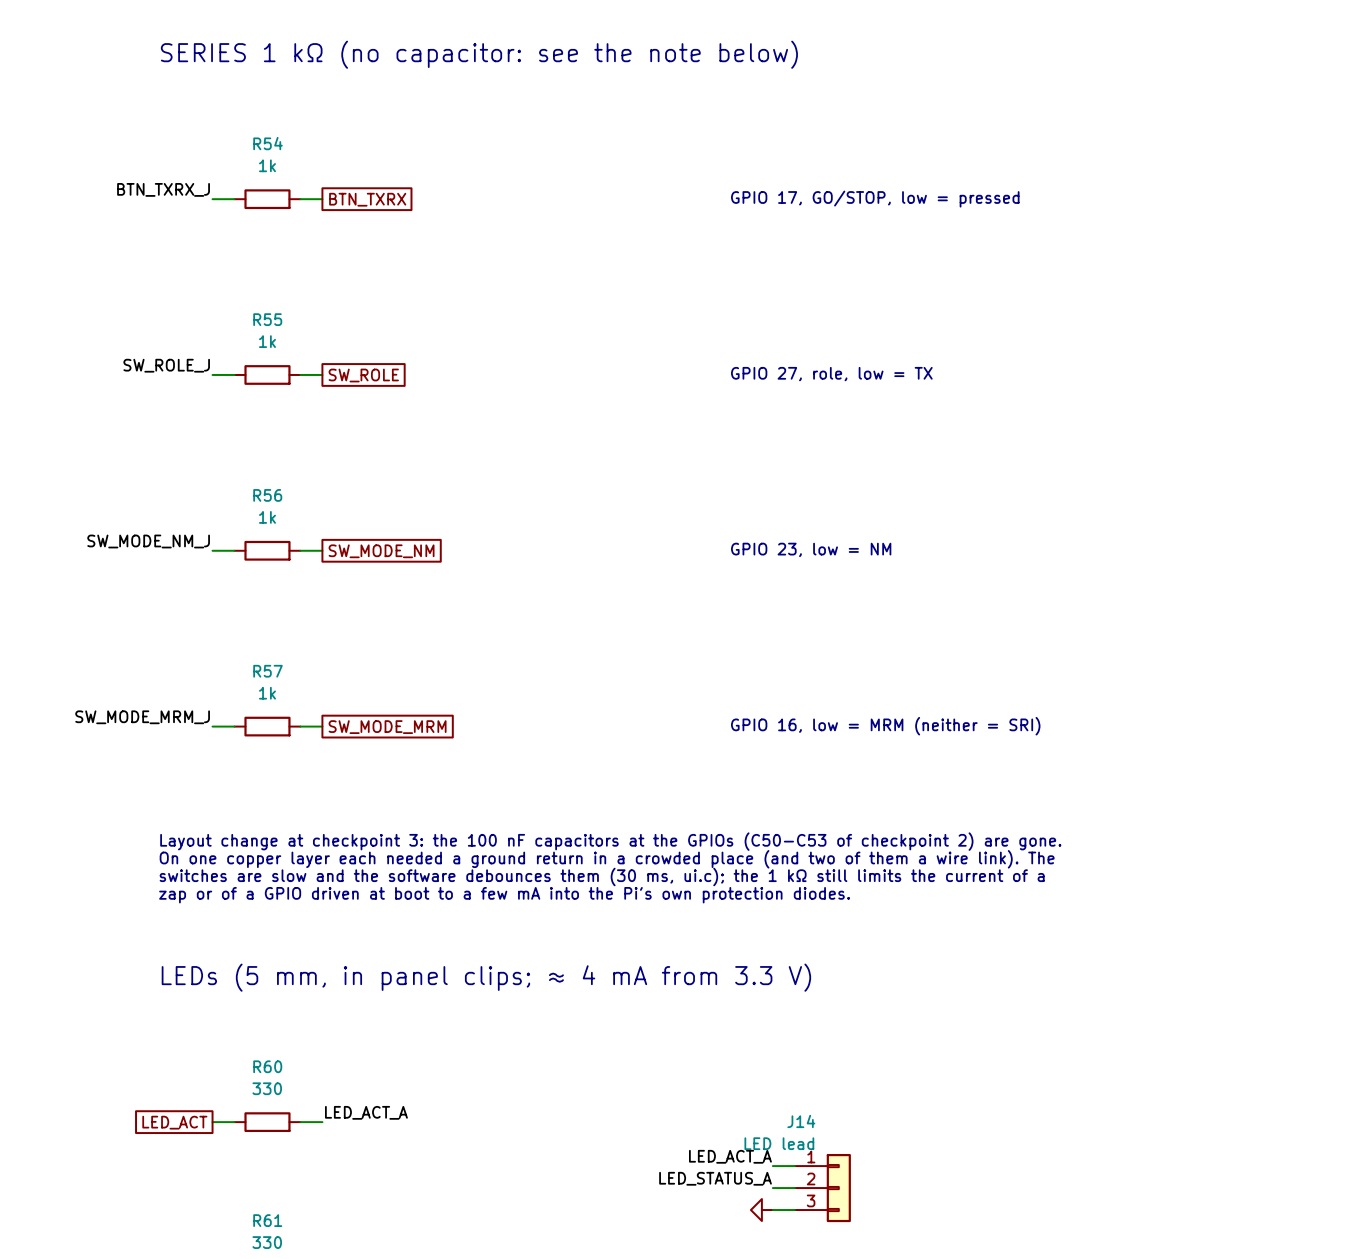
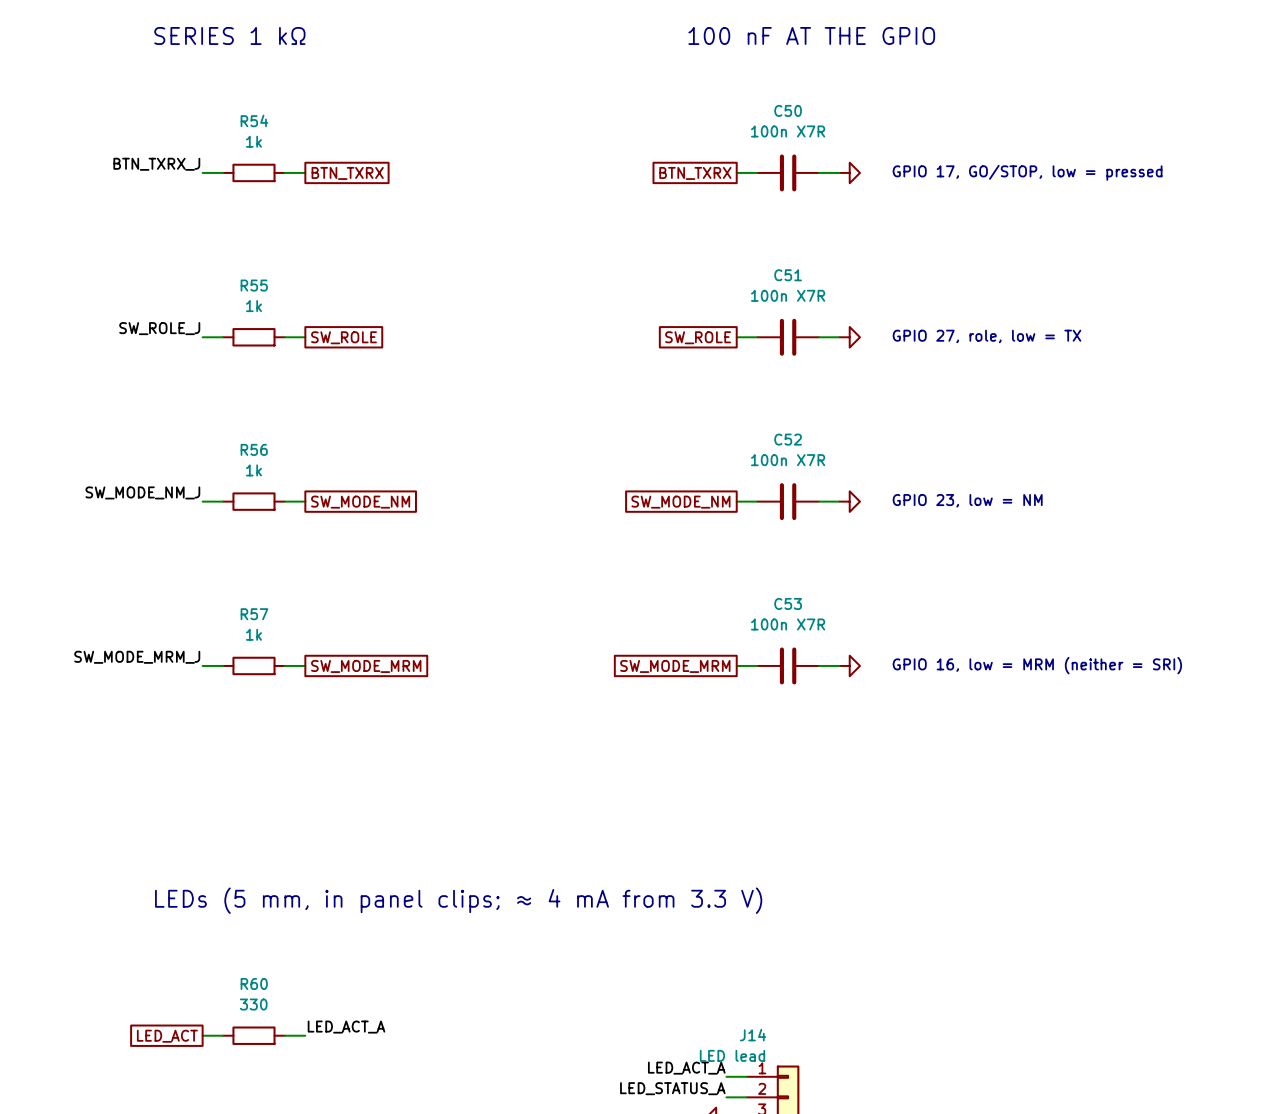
text: none -> 100 nF AT THE GPIO (811, 35)
text: SERIES 1 kΩ (no capacitor: see the note below) (479, 54) -> SERIES 1 kΩ (229, 35)
global label: none -> BTN_TXRX (695, 173)
wire: none -> (736, 172) (757, 172)
C50: none -> 100n X7R (788, 172)
wire: none -> (818, 172) (839, 172)
text: GPIO 17, GO/STOP, low = pressed (875, 199) -> none
power symbol: none -> (849, 172)
text: none -> GPIO 17, GO/STOP, low = pressed (1027, 172)
wire: none -> (736, 337) (757, 337)
text: GPIO 27, role, low = TX (831, 374) -> none
C51: none -> 100n X7R (788, 337)
wire: none -> (818, 337) (839, 337)
power symbol: none -> (849, 337)
text: none -> GPIO 27, role, low = TX (986, 336)
global label: none -> SW_ROLE (698, 337)
text: GPIO 23, low = NM (811, 549) -> none
text: none -> GPIO 23, low = NM (967, 500)
wire: none -> (736, 501) (757, 501)
C52: none -> 100n X7R (788, 501)
power symbol: none -> (849, 501)
global label: none -> SW_MODE_NM (680, 502)
wire: none -> (736, 665) (757, 665)
C53: none -> 100n X7R (788, 665)
wire: none -> (818, 665) (839, 665)
text: GPIO 16, low = MRM (neither = SRI) (885, 726) -> none
power symbol: none -> (849, 665)
text: none -> GPIO 16, low = MRM (neither = SRI) (1037, 665)
global label: none -> SW_MODE_MRM (675, 666)
text: Layout change at checkpoint 3: the 100 nF capacitors at the GPIOs (C50-C53 of checkpoint 2) are gone. (610, 841) -> none
text: On one copper layer each needed a ground return in a crowded place (and two of them a wire link). The (607, 859) -> none
text: switches are slow and the software debounces them (30 ms, ui.c); the 1 kΩ still limits the current of a (602, 876) -> none
text: zap or of a GPIO driven at boot to a few mA into the Pi's own protection diodes. (504, 895) -> none

